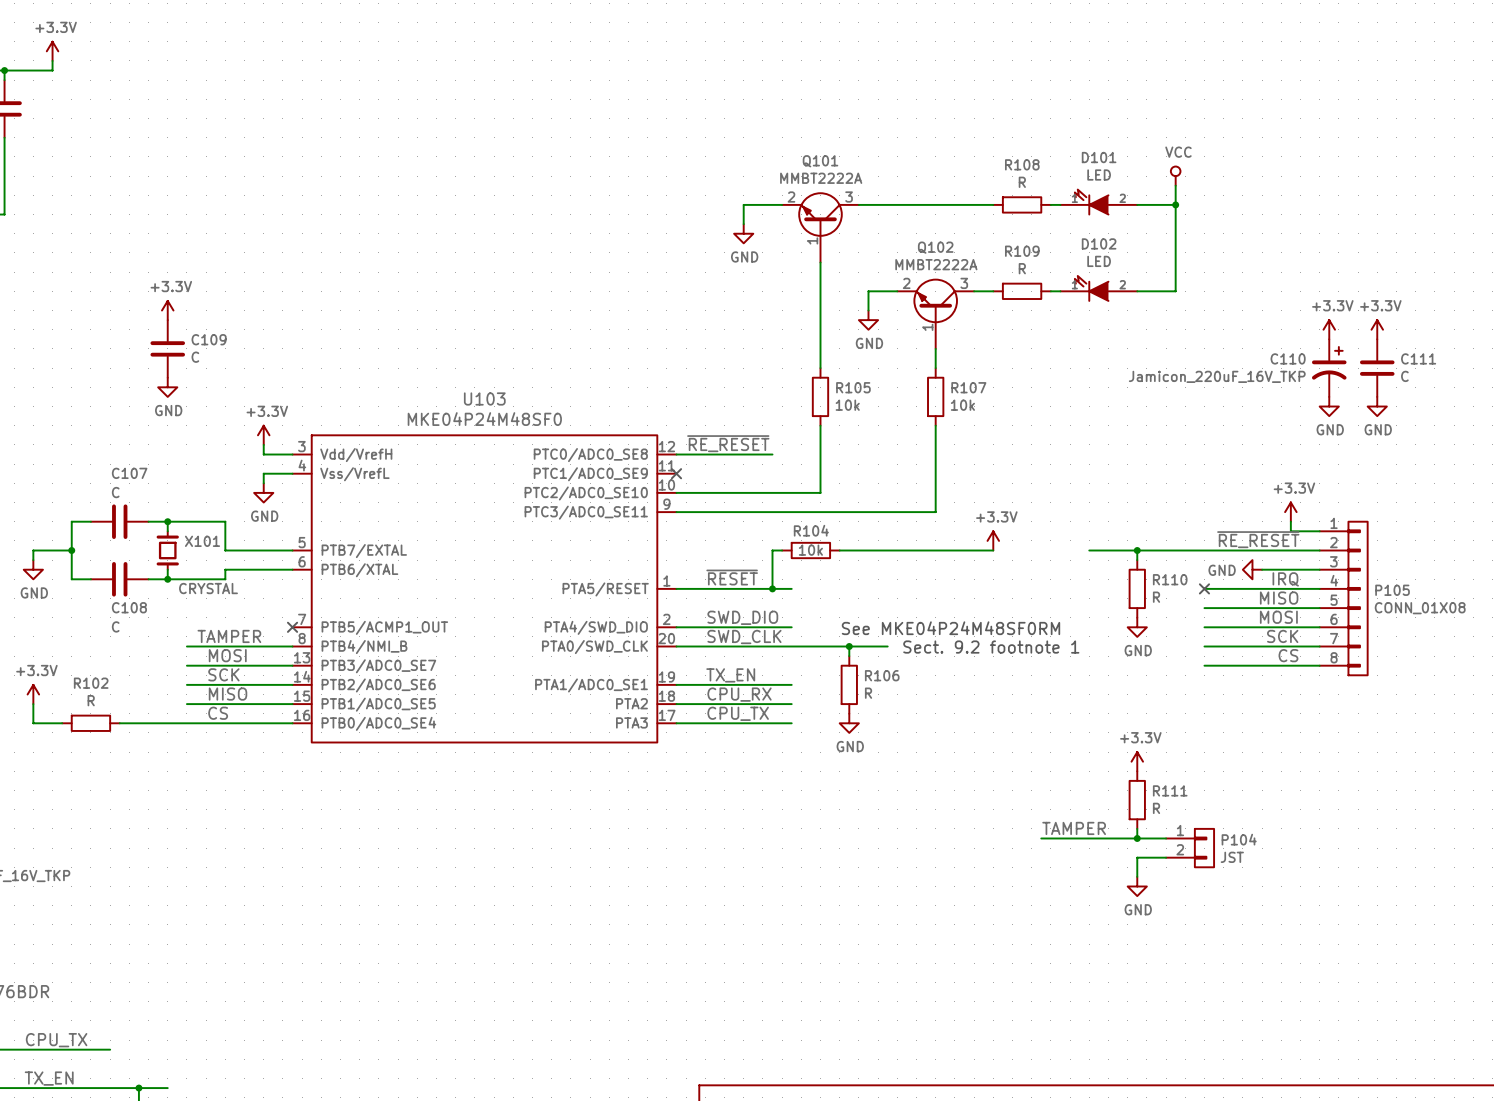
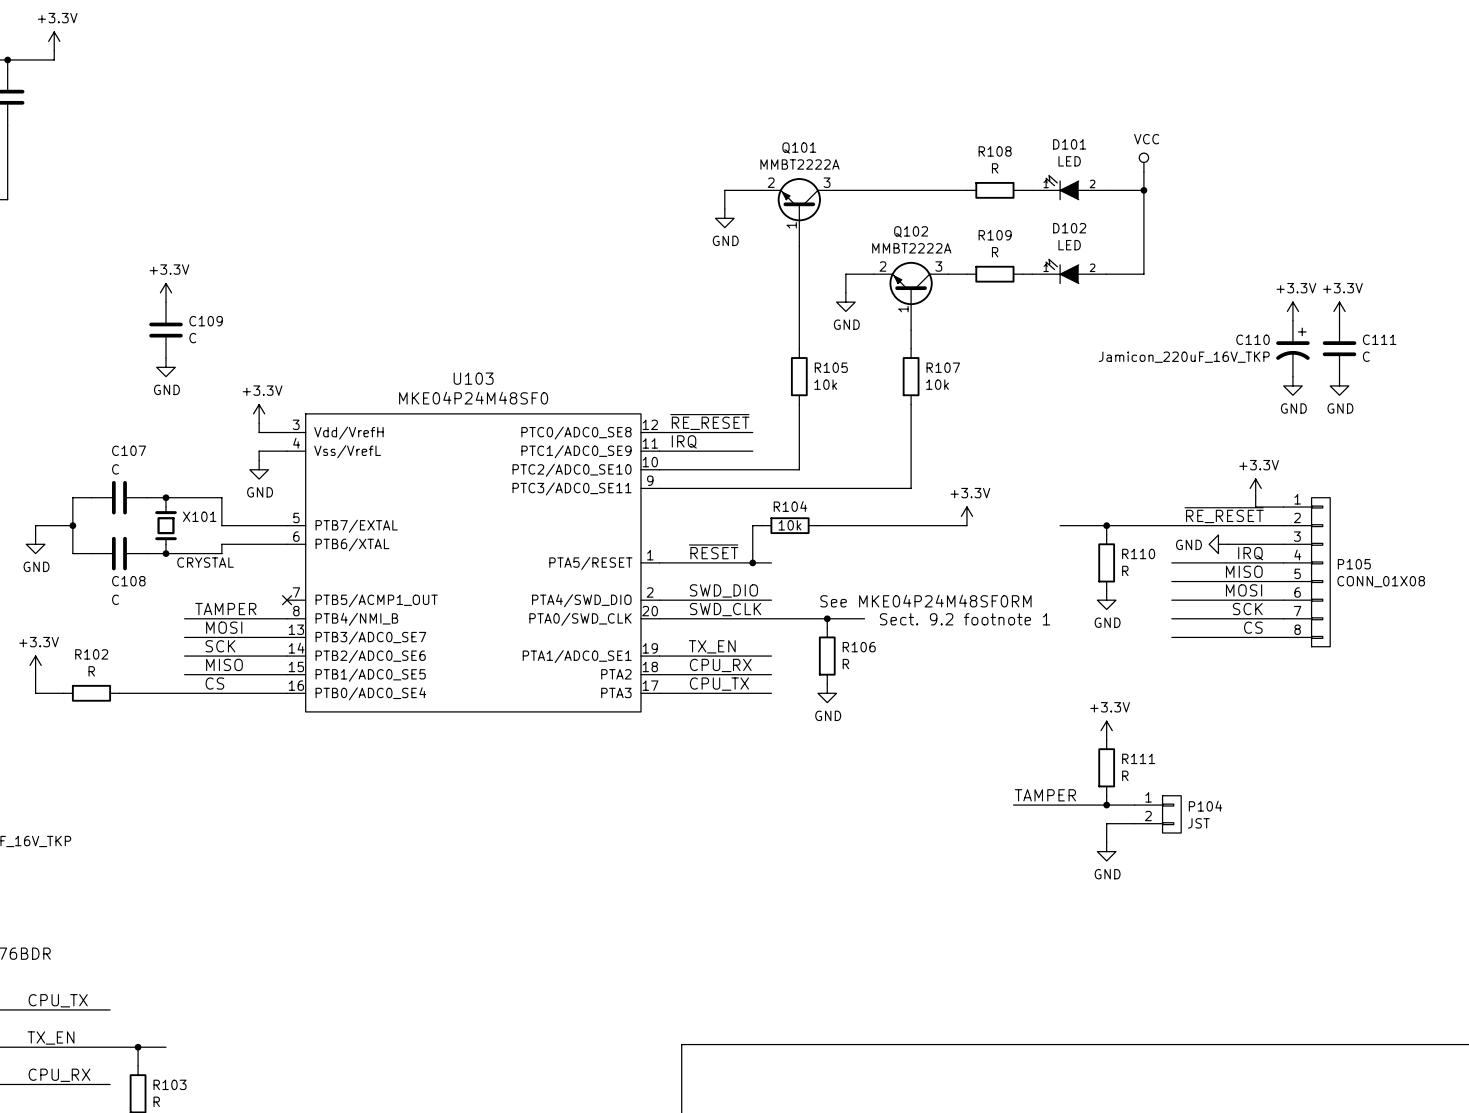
label: none -> IRQ (684, 441)
wire: none -> (659, 451) (752, 451)
no-connect mark: (676, 473) -> none
no-connect mark: (1204, 588) -> none

